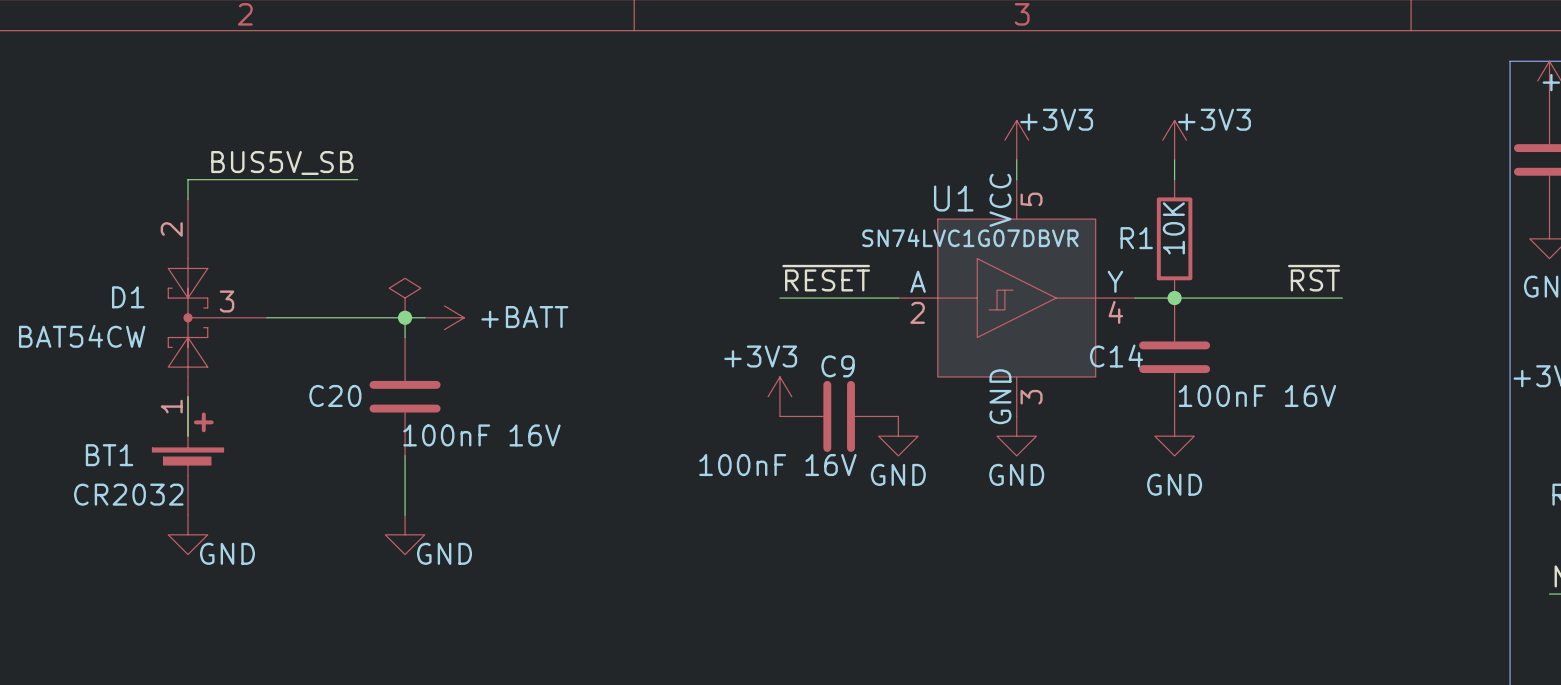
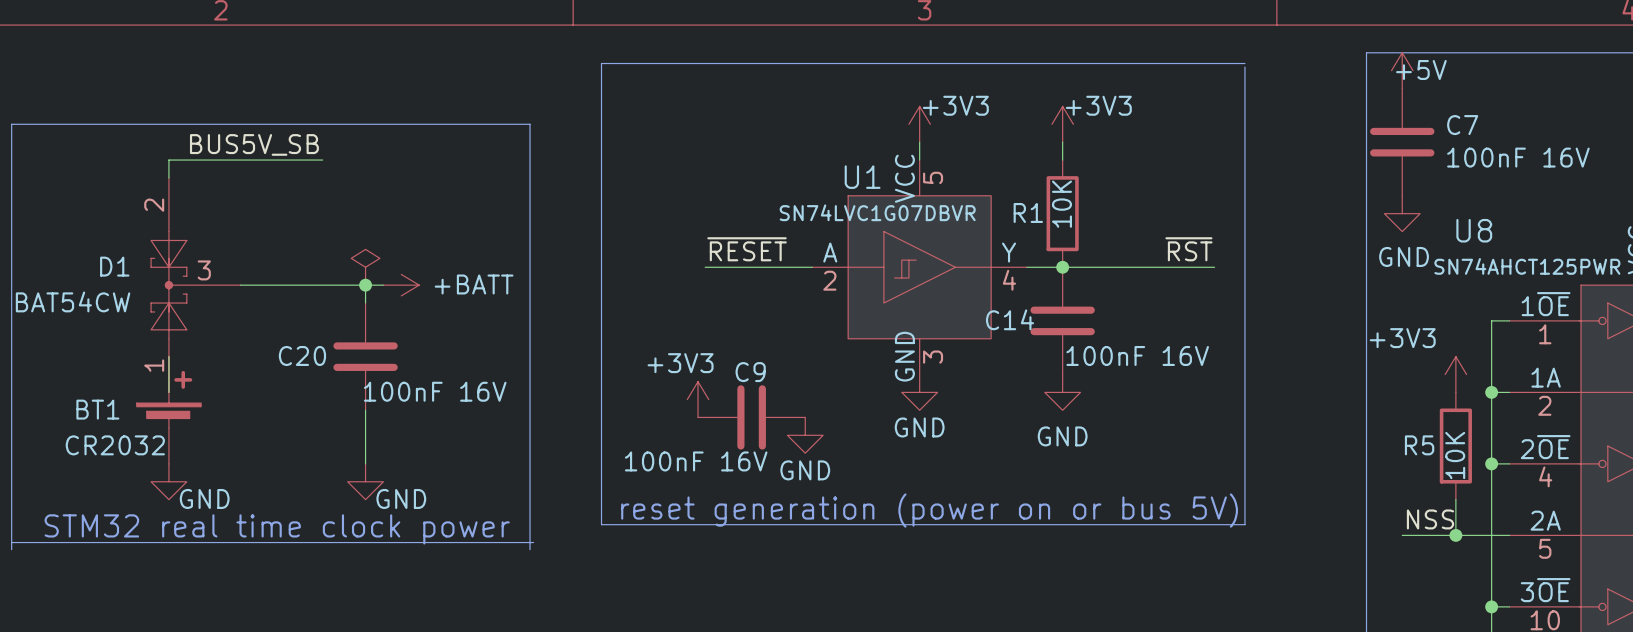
line: none -> (1244, 63) (601, 63) (601, 524) (1244, 524) (1244, 67)
power symbol position: +3V3 (779, 396) -> +3V3 (698, 399)
C9 position: (839, 416) -> (751, 417)
power symbol position: GND (898, 436) -> GND (805, 435)
text: none -> reset generation (power on or bus 5V) (929, 510)
text: none -> STM32 real time clock power (277, 529)
line: none -> (11, 542) (533, 542)
line: none -> (11, 549) (11, 124) (530, 124) (530, 549)

